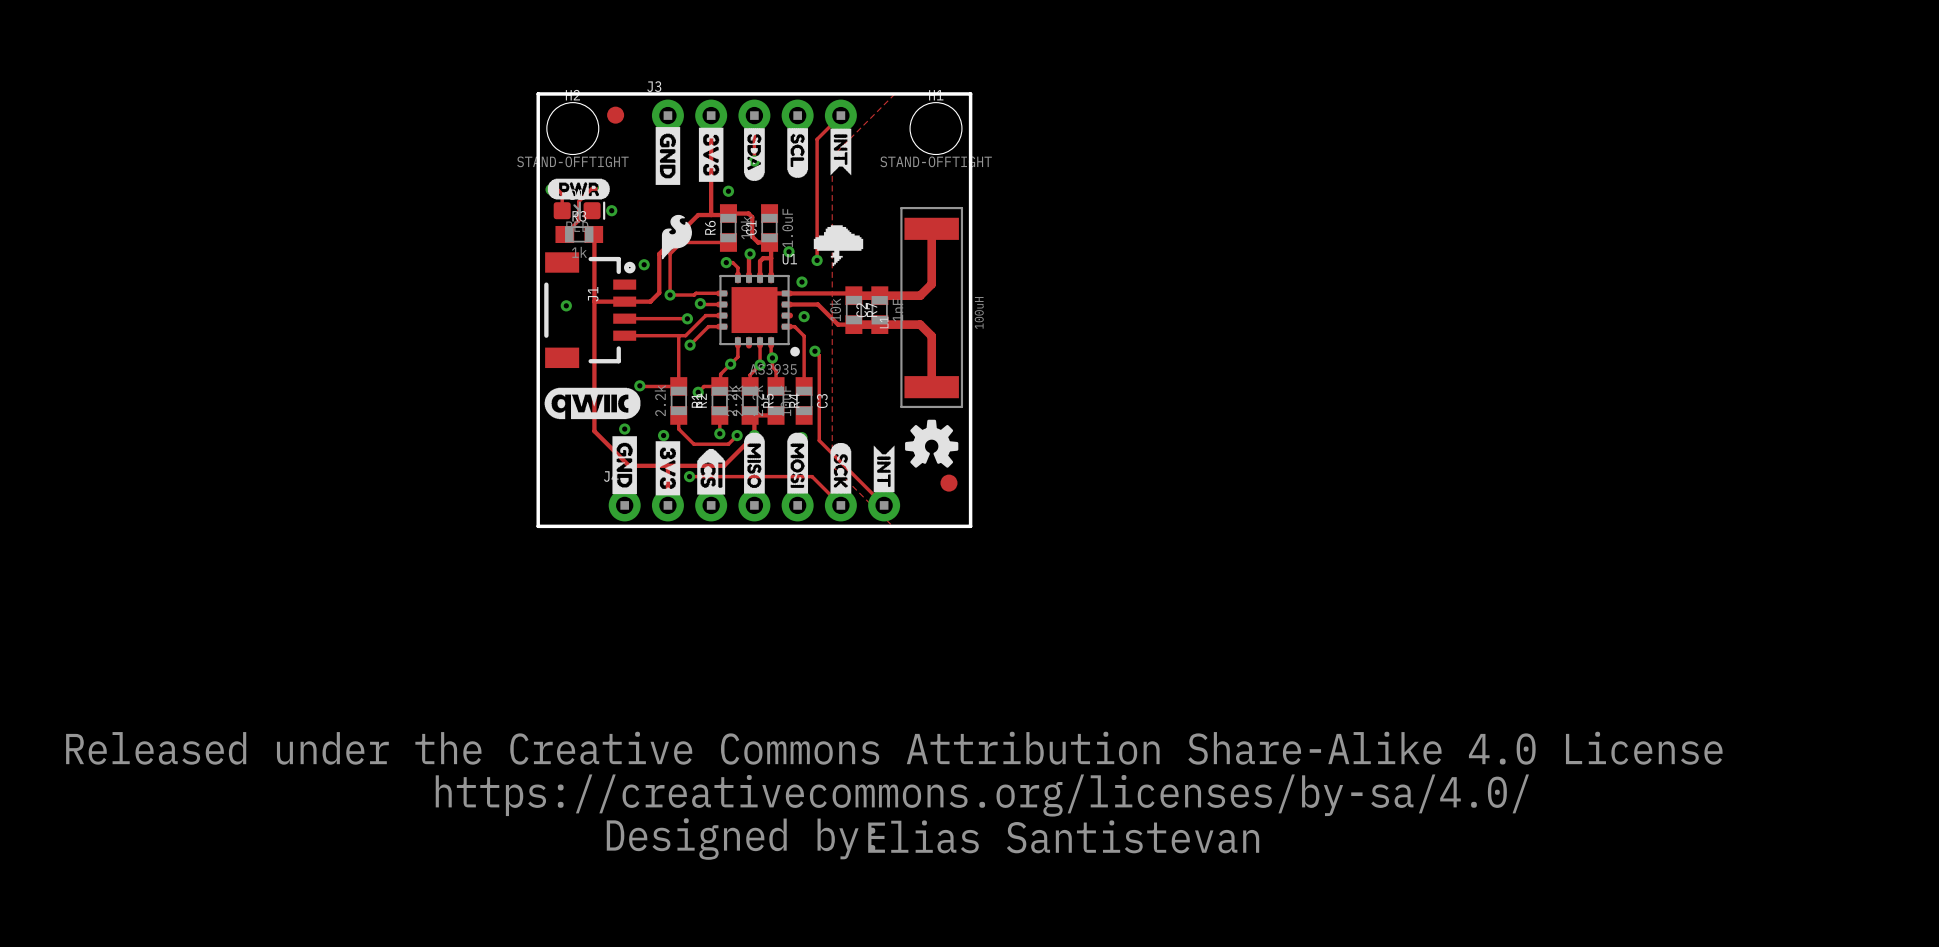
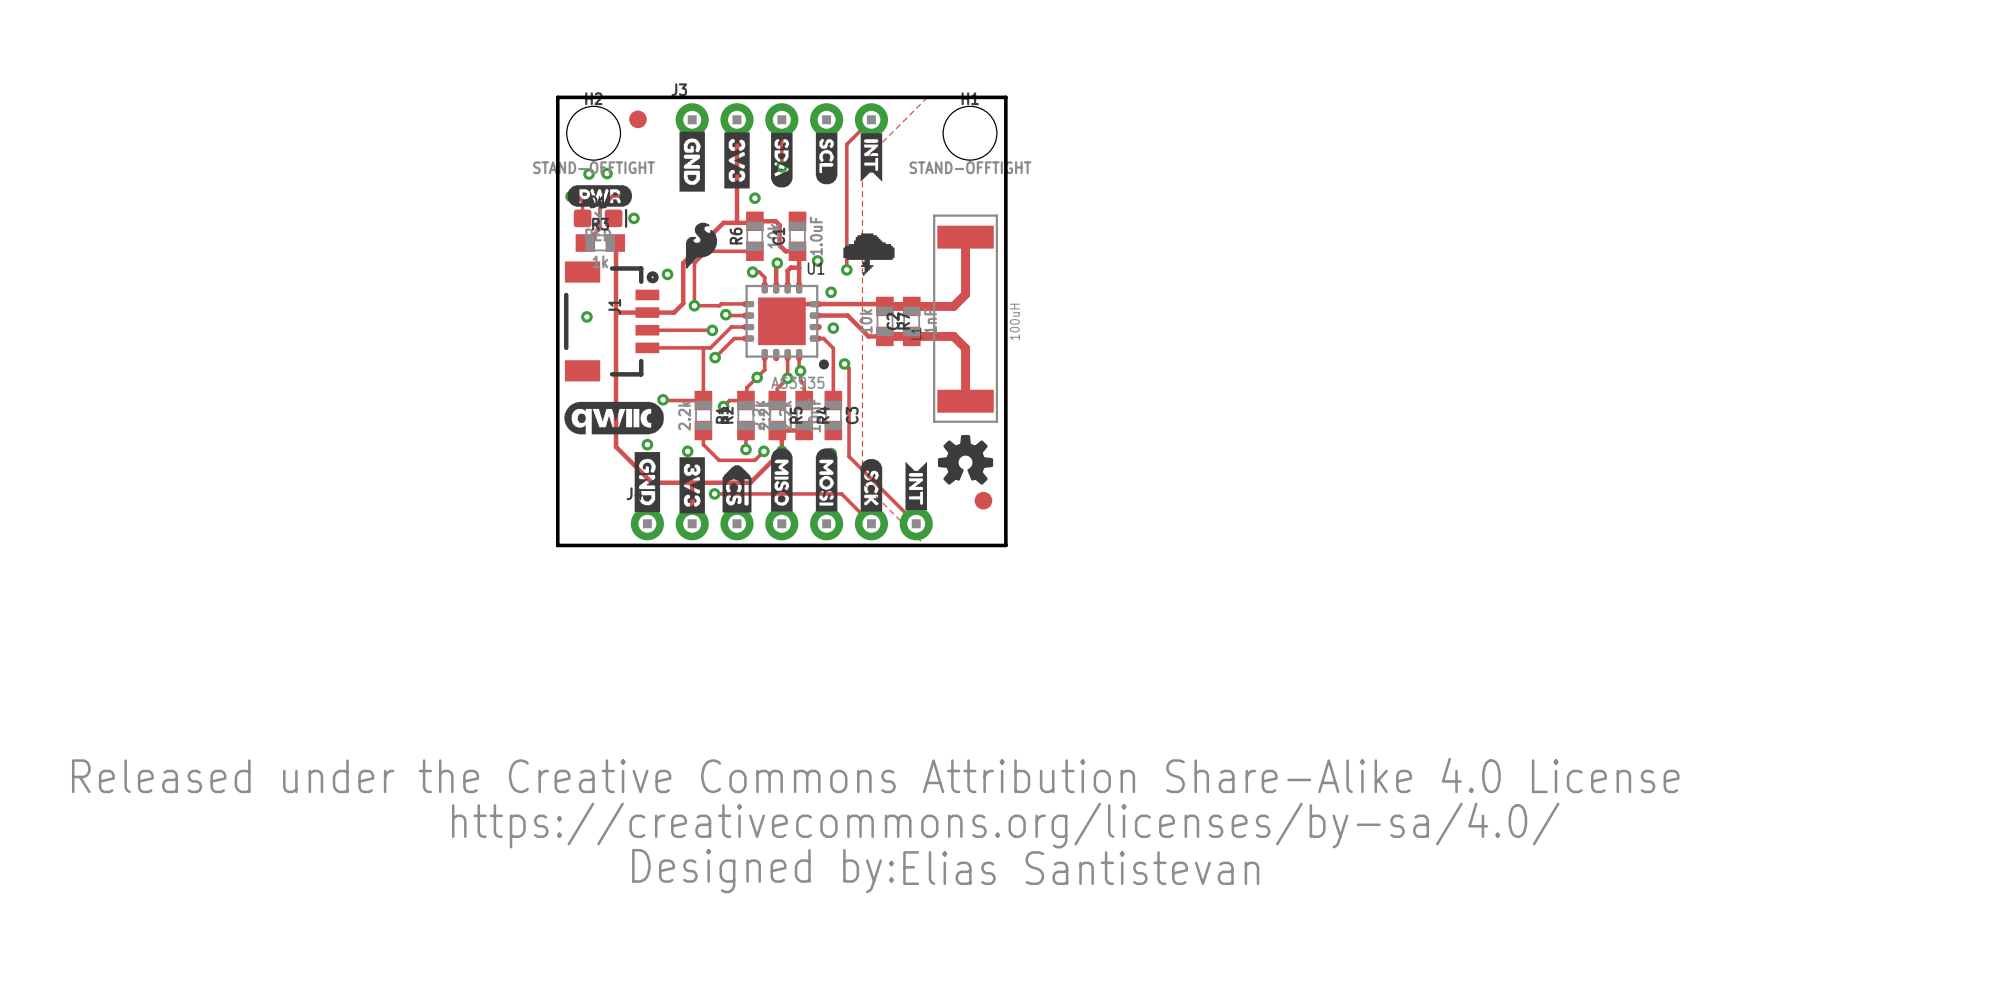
via: none -> (589, 174)
via: none -> (607, 173)

